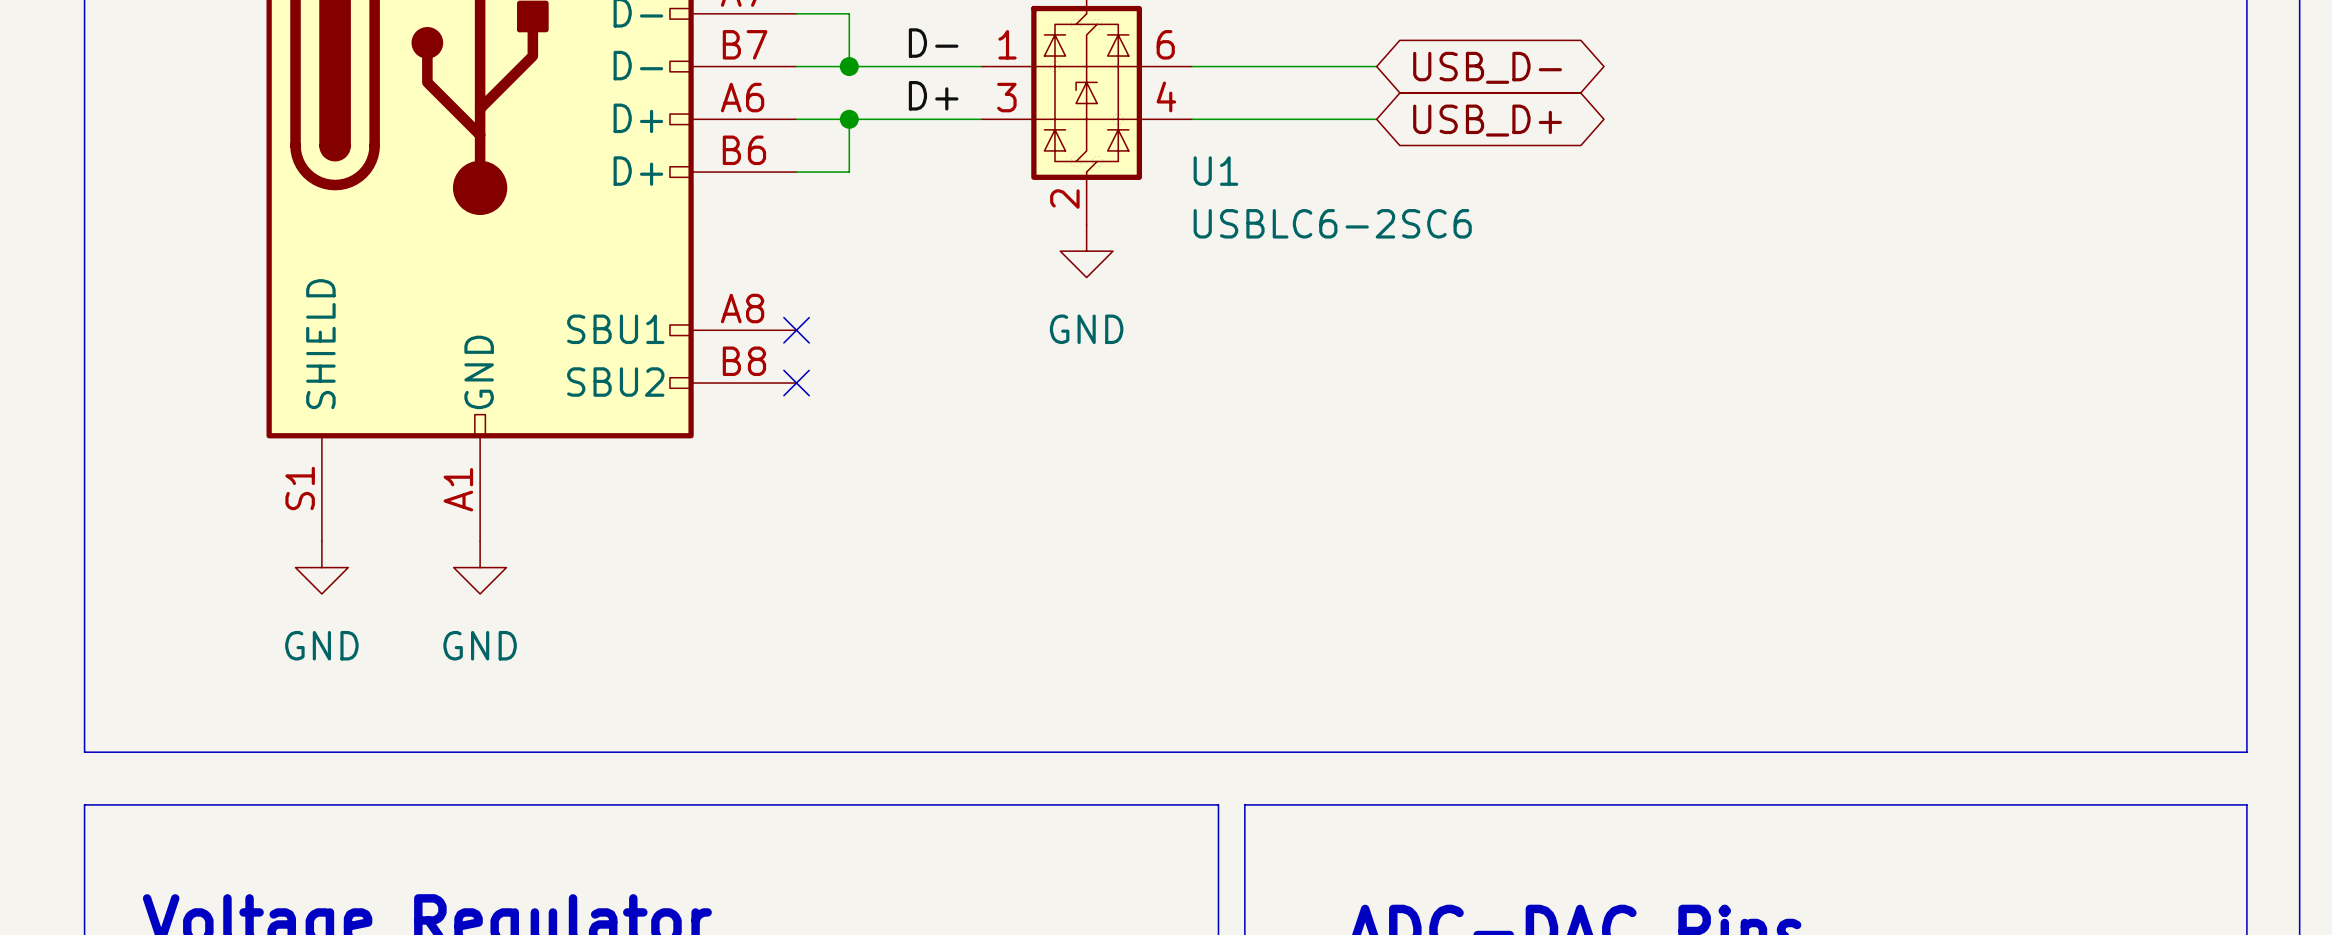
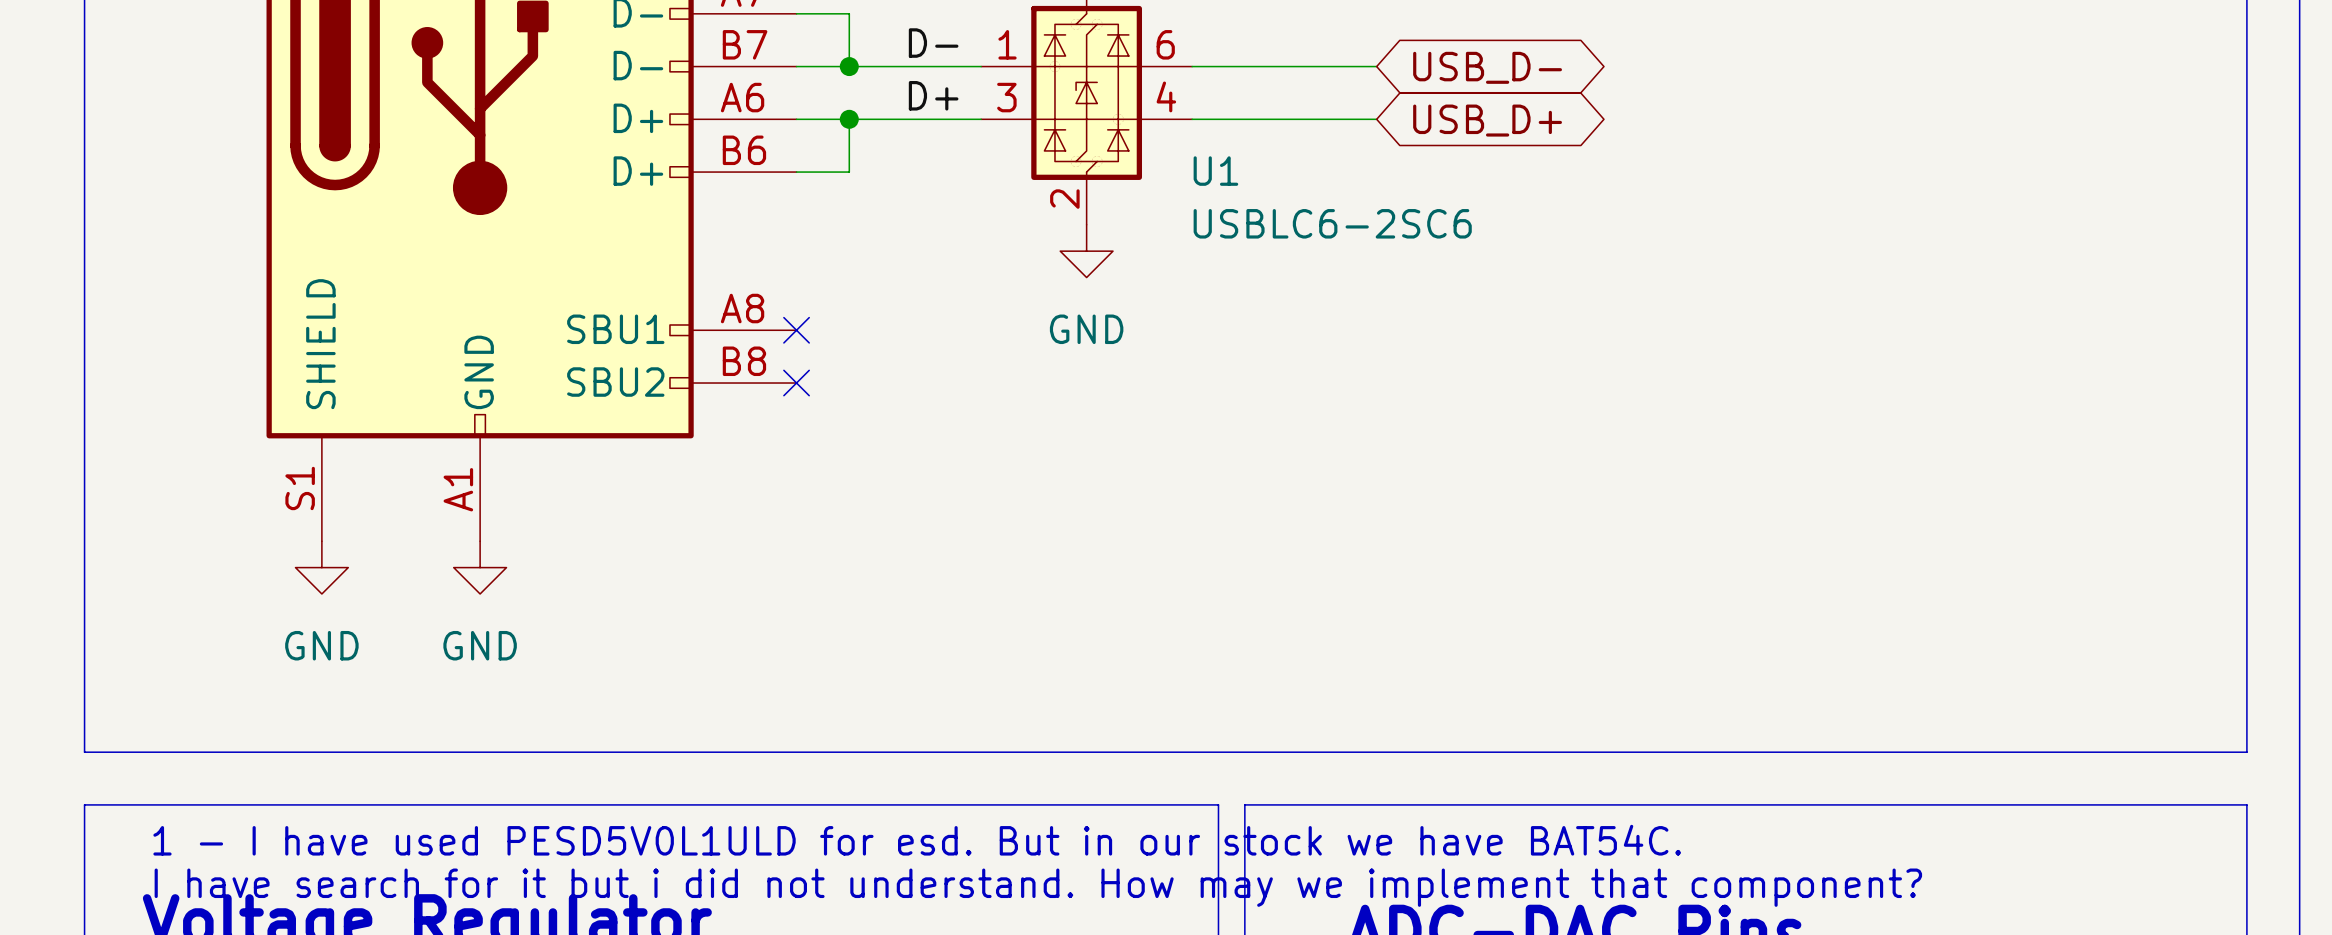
text: none -> 1 - I have used PESD5V0L1ULD for esd. But in our stock we have BAT54C. (917, 840)
text: none -> I have search for it but i did not understand. How may we implement that component? (1038, 887)

